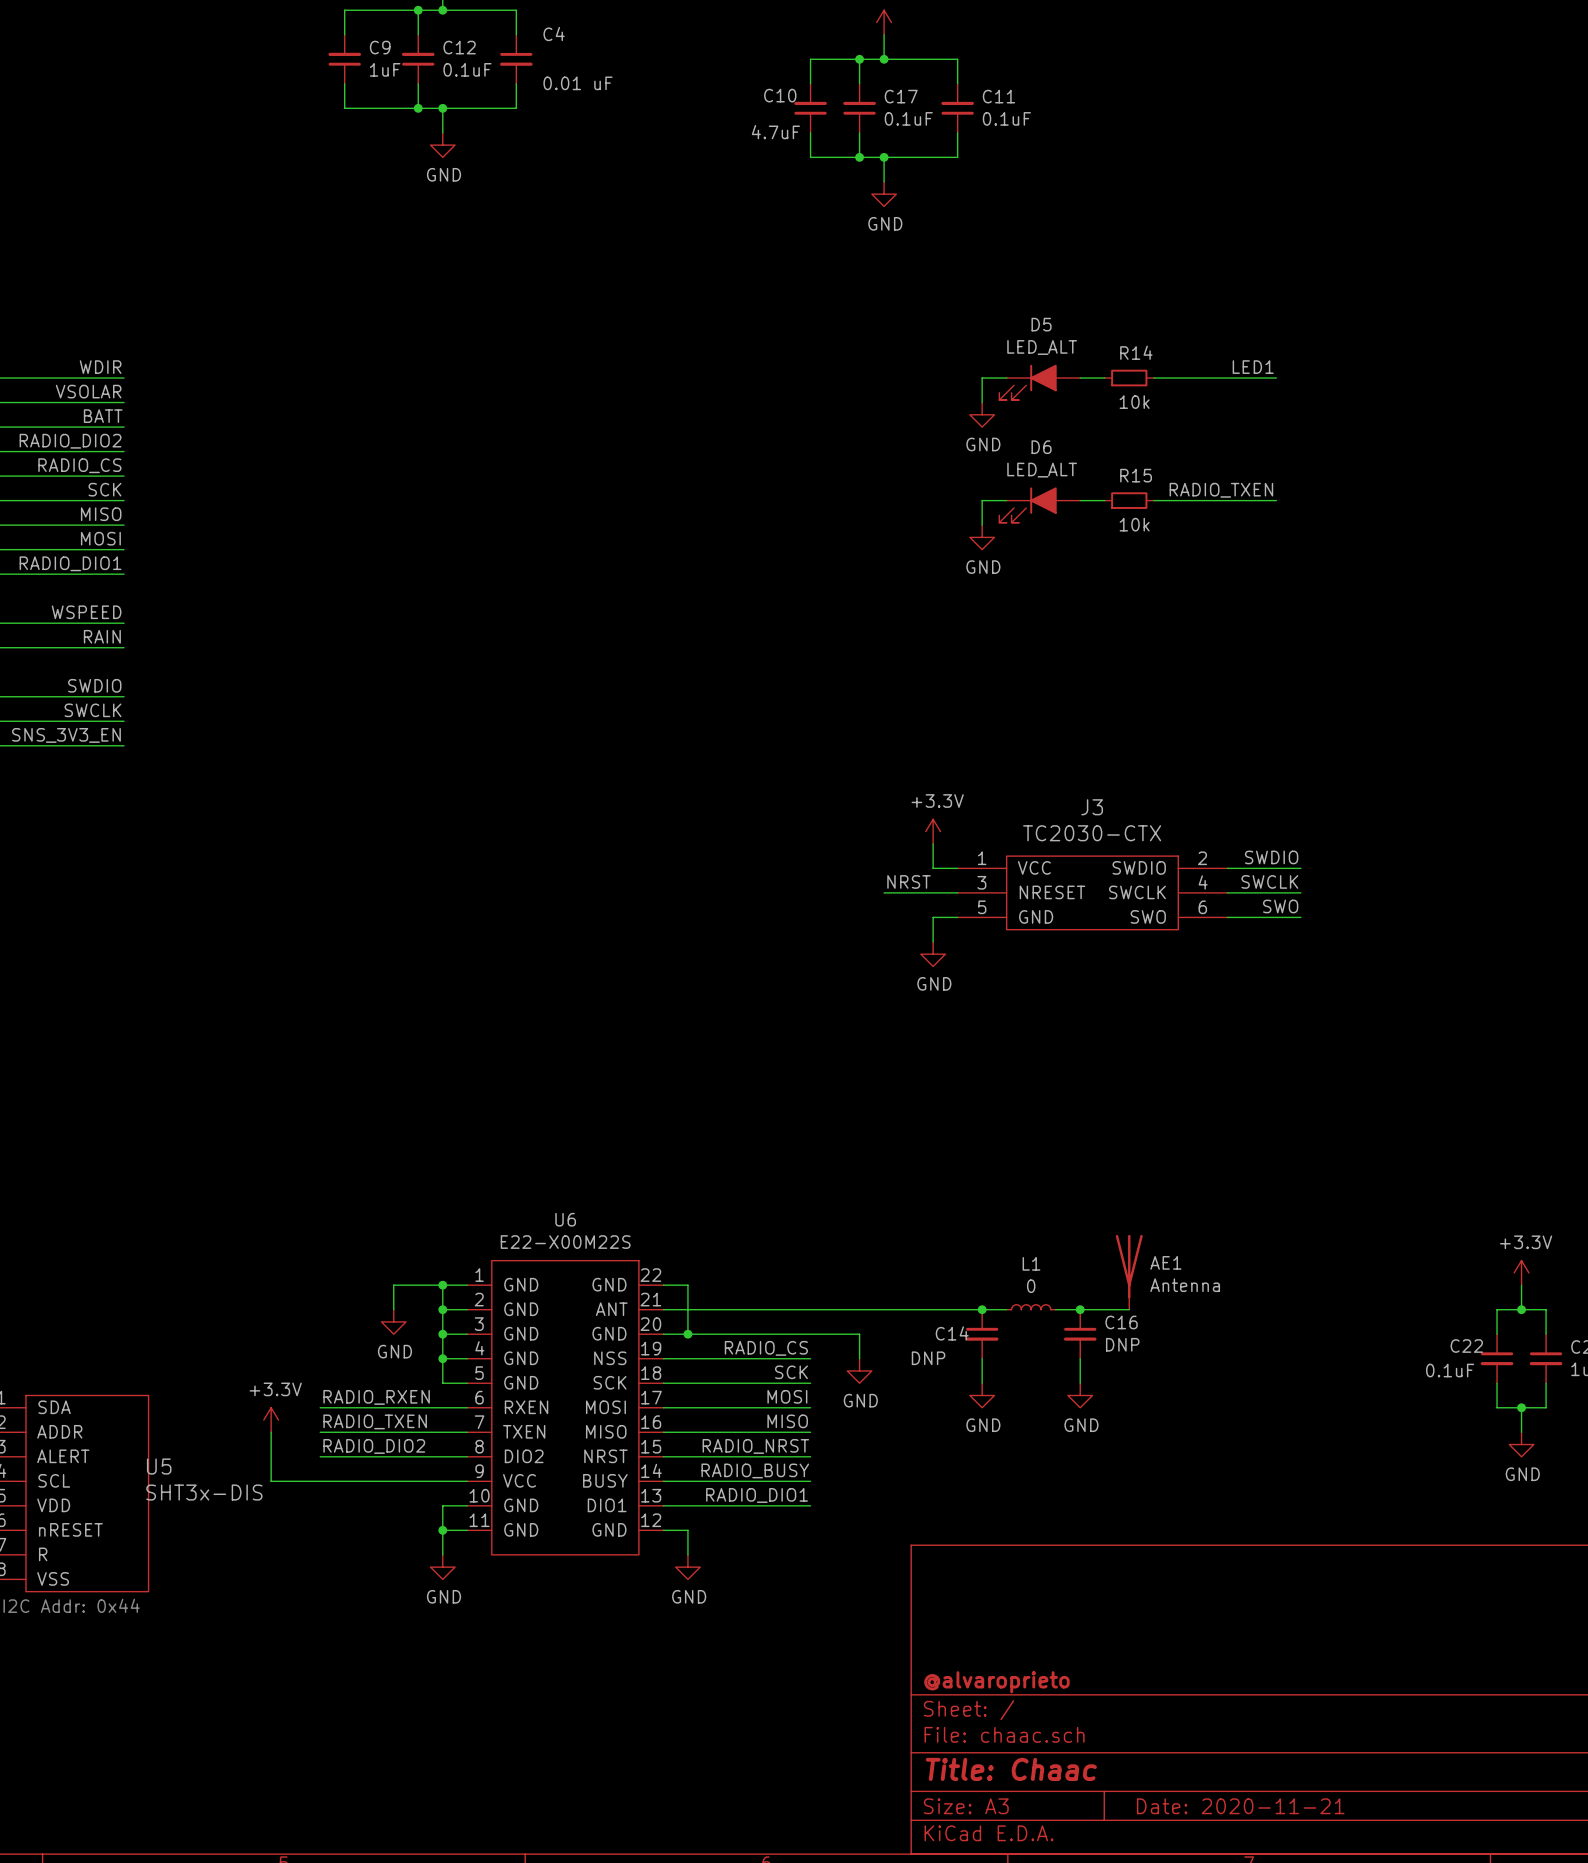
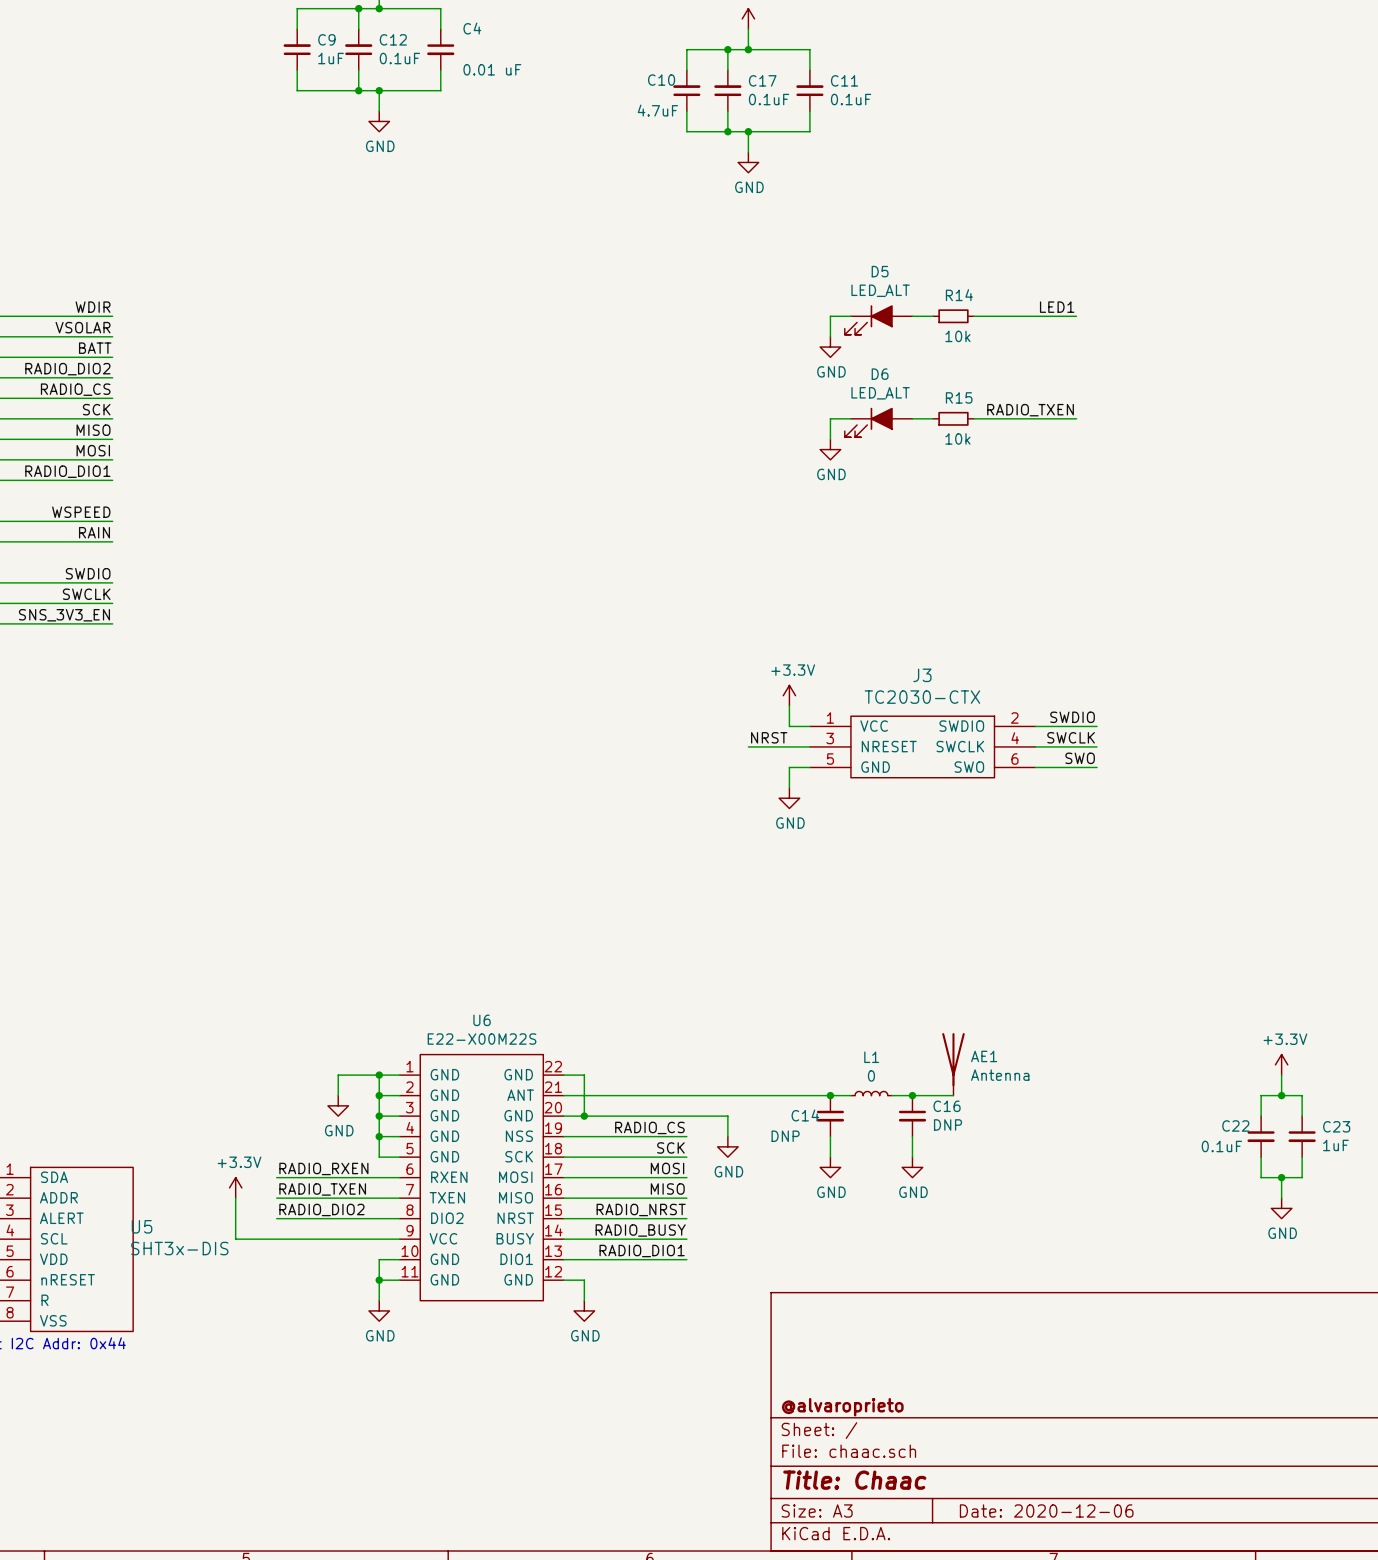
title block: Date: 2020-11-21 (1240, 1806) -> Date: 2020-12-06 (1046, 1510)

